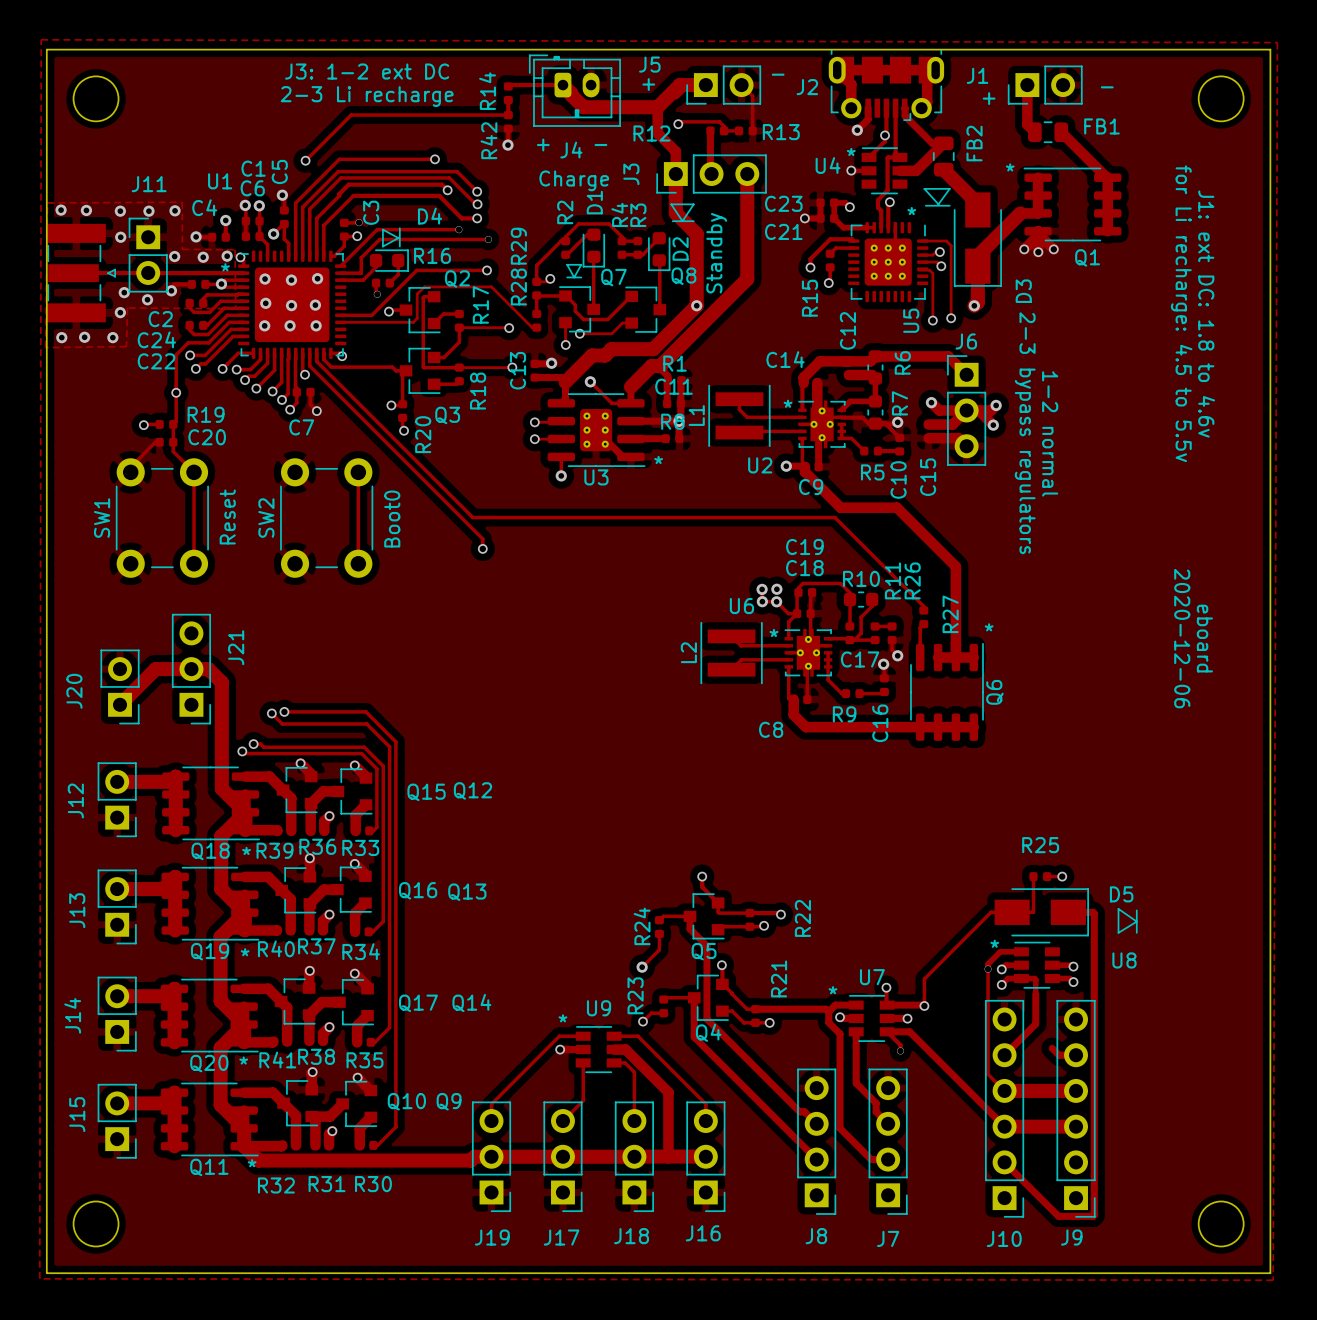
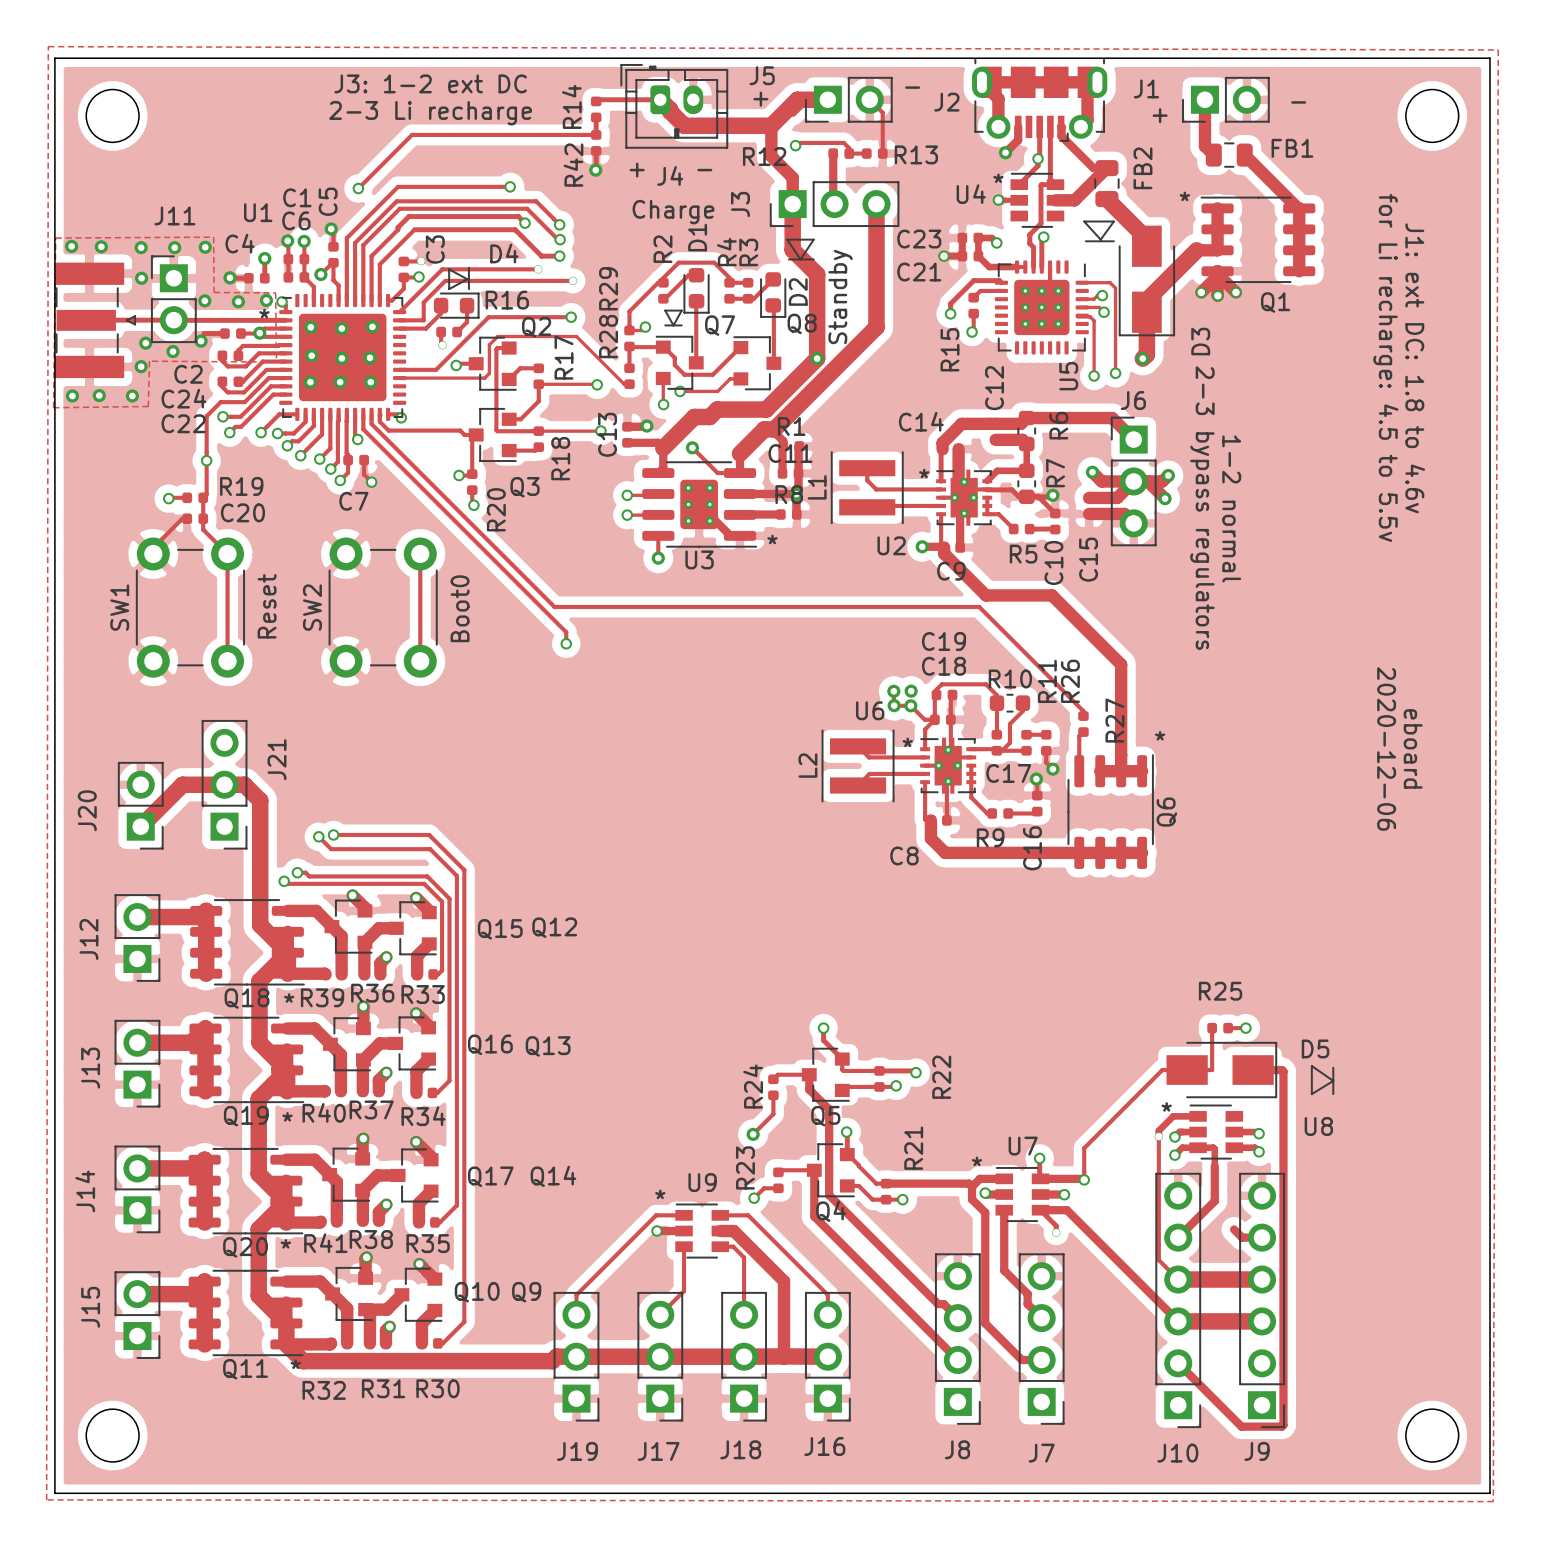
text: * (911, 211) -> none

